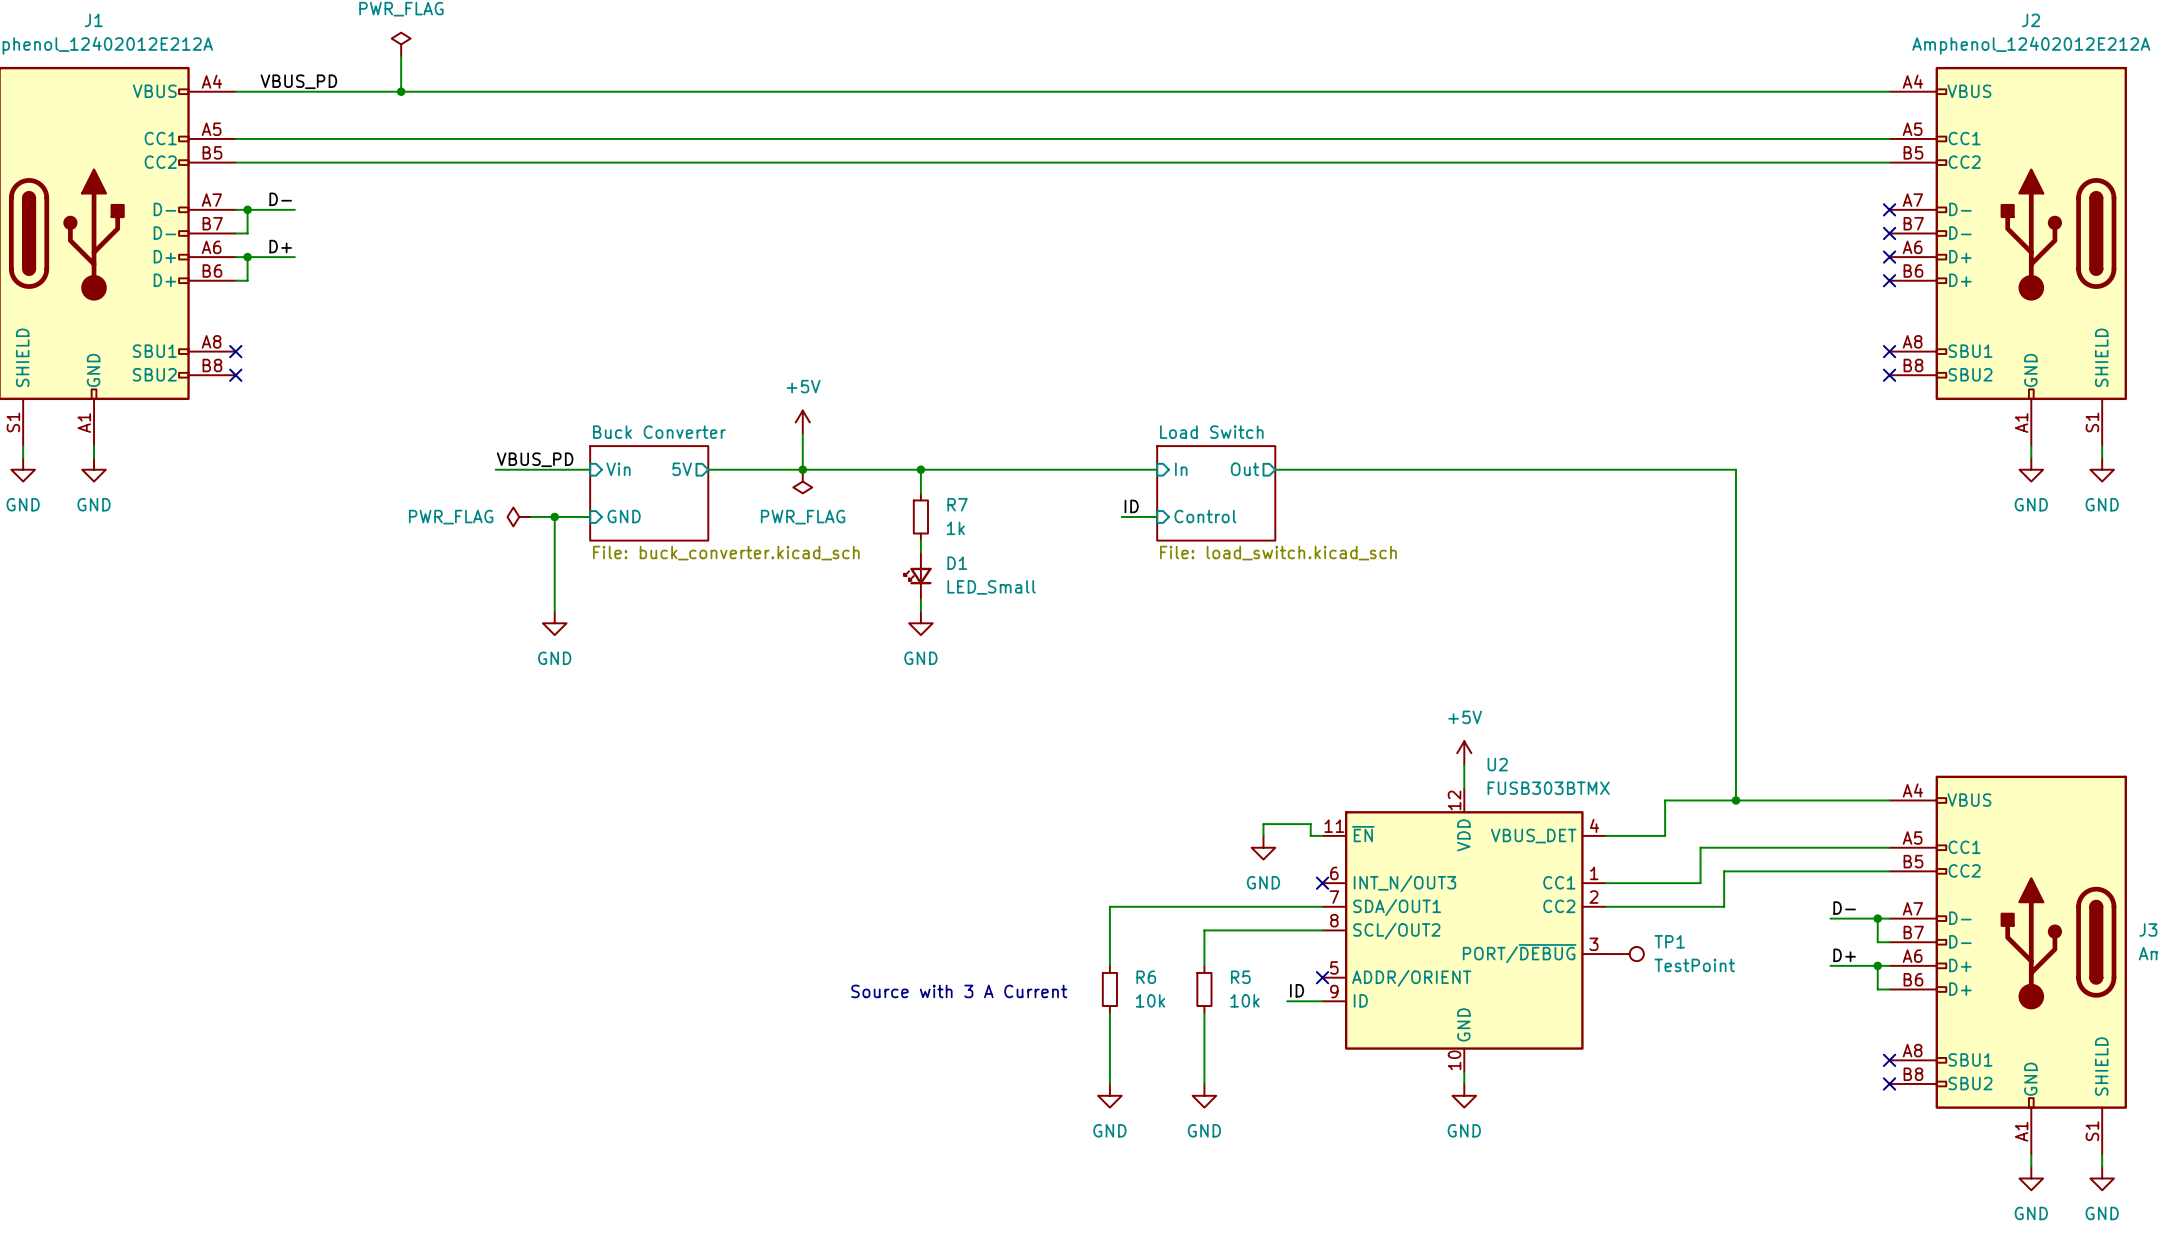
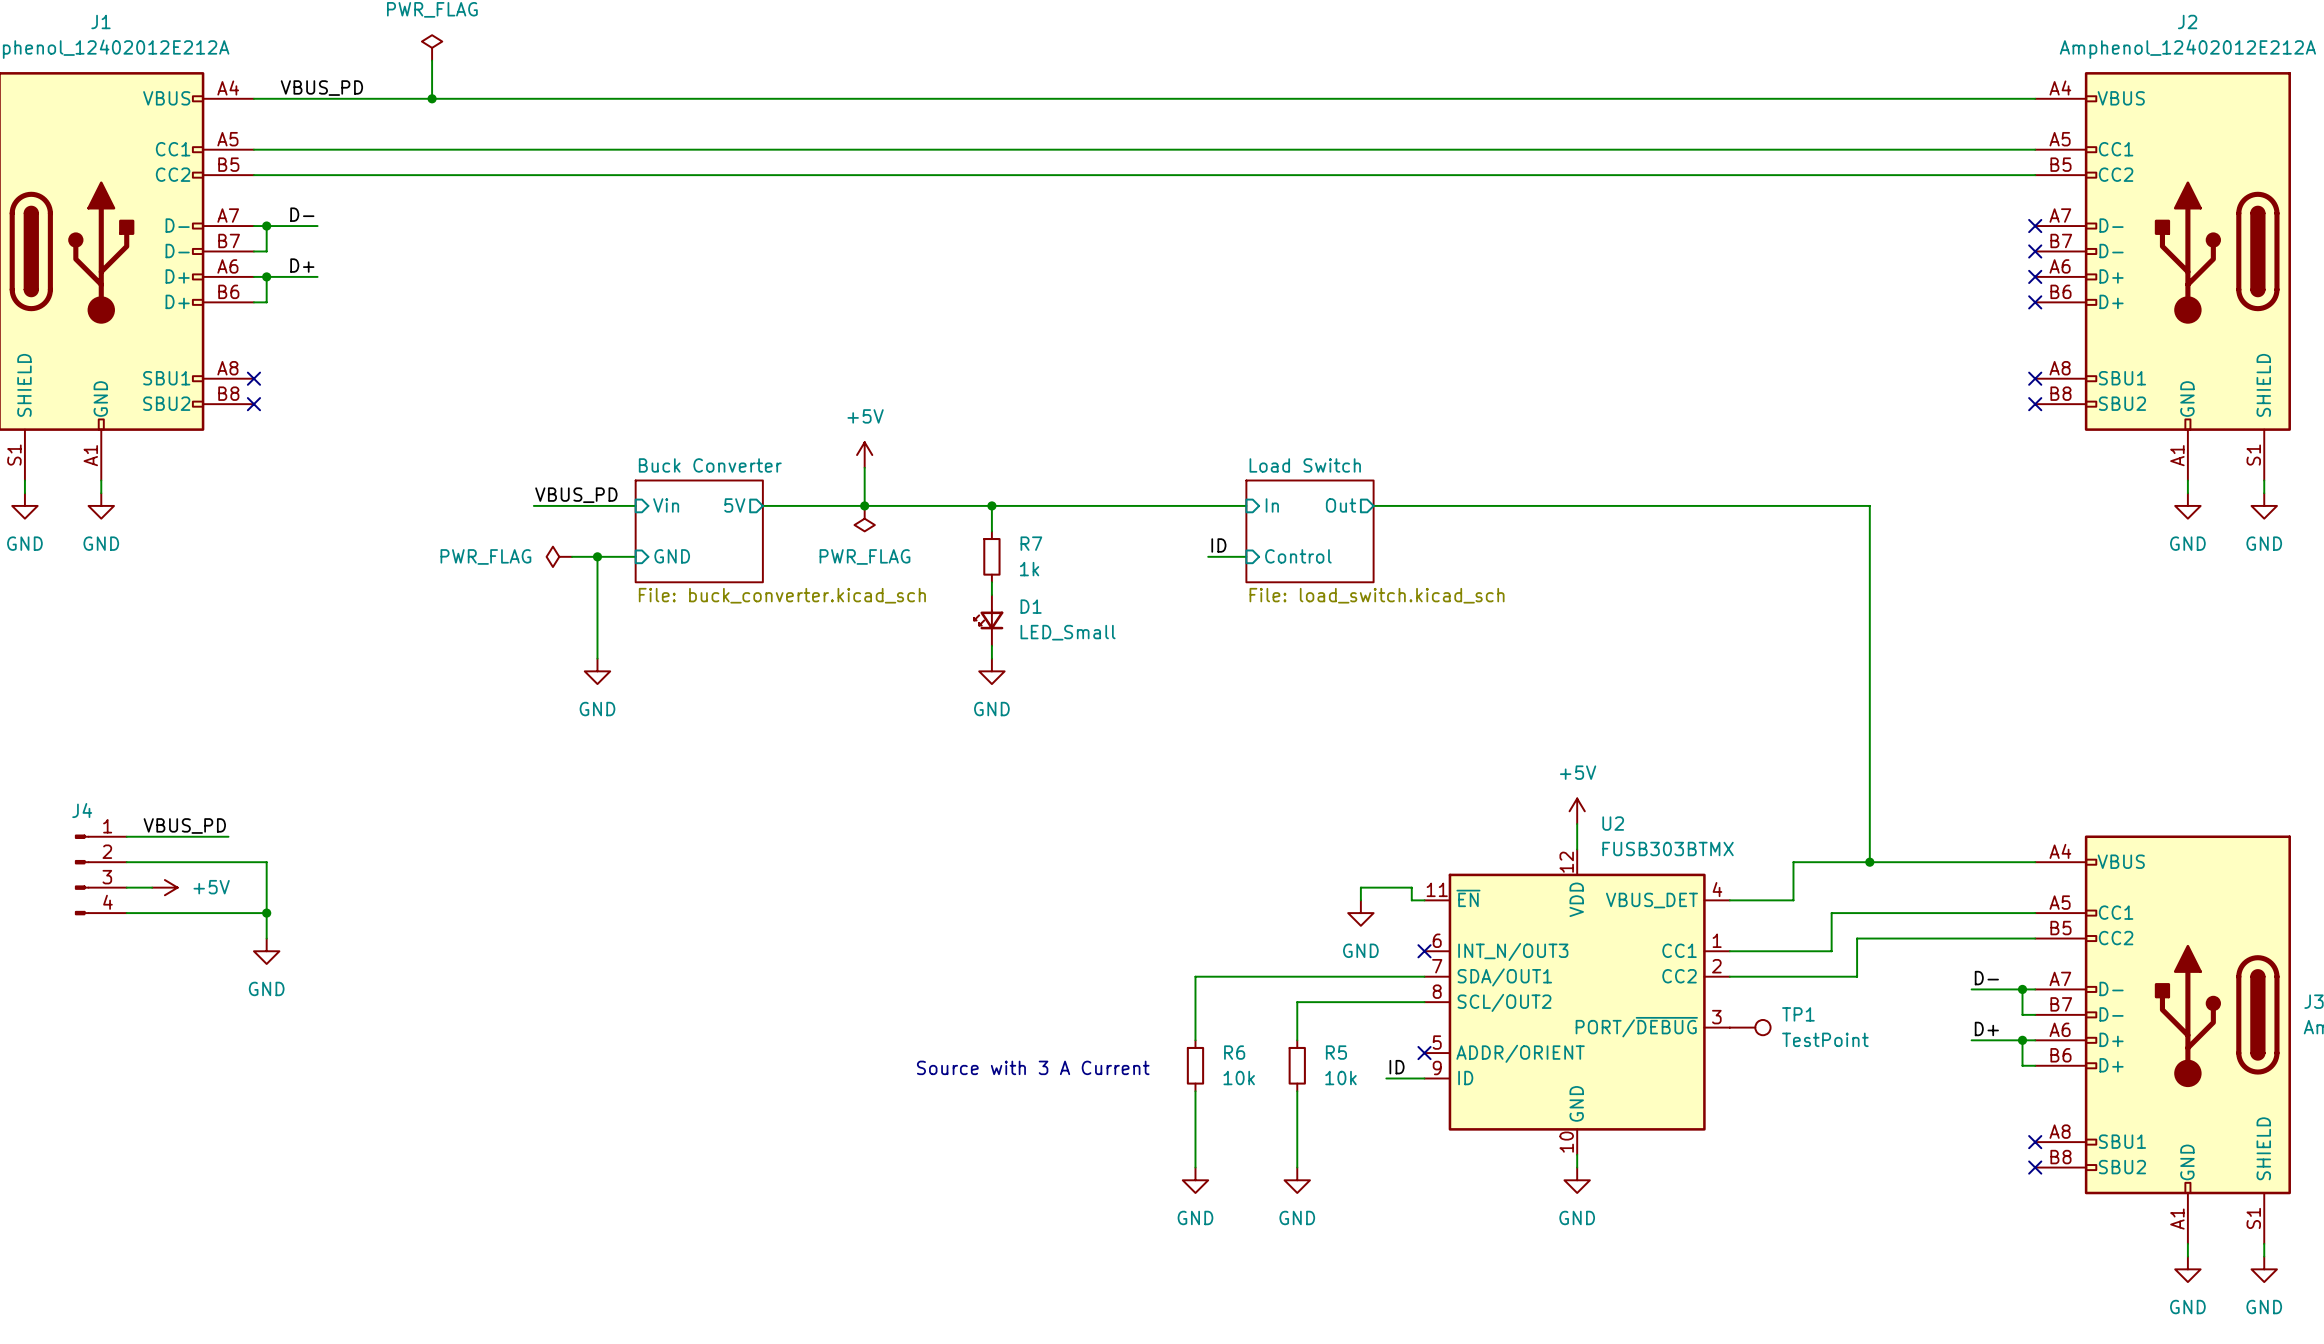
label: none -> VBUS_PD (184, 826)
wire: none -> (126, 836) (228, 836)
wire: none -> (126, 862) (266, 862) (266, 938)
J4: none -> (100, 874)
wire: none -> (126, 887) (152, 887)
power symbol: none -> +5V (164, 887)
wire: none -> (126, 913) (266, 913)
junction: none -> (266, 913)
power symbol: none -> GND (266, 951)

